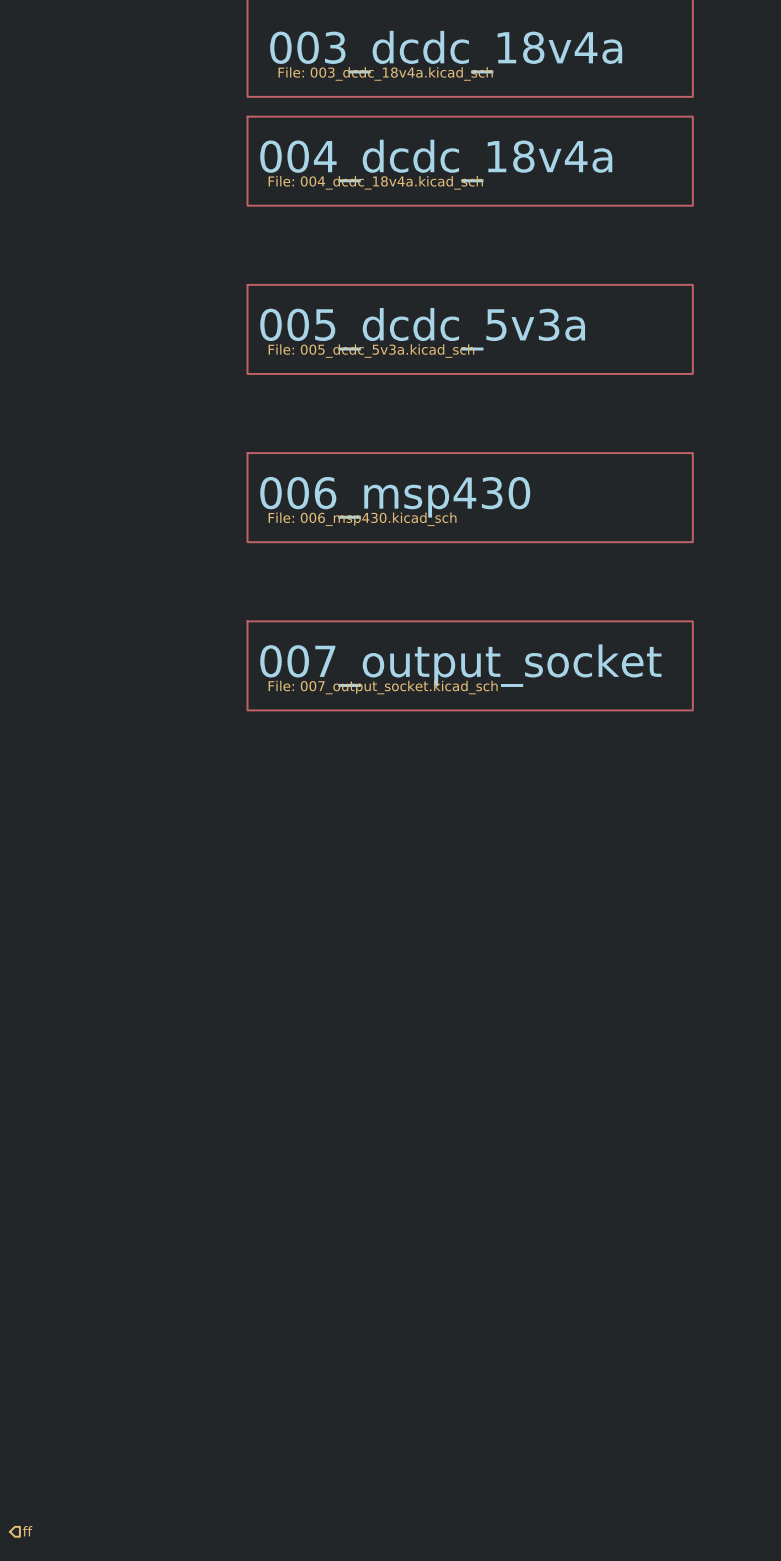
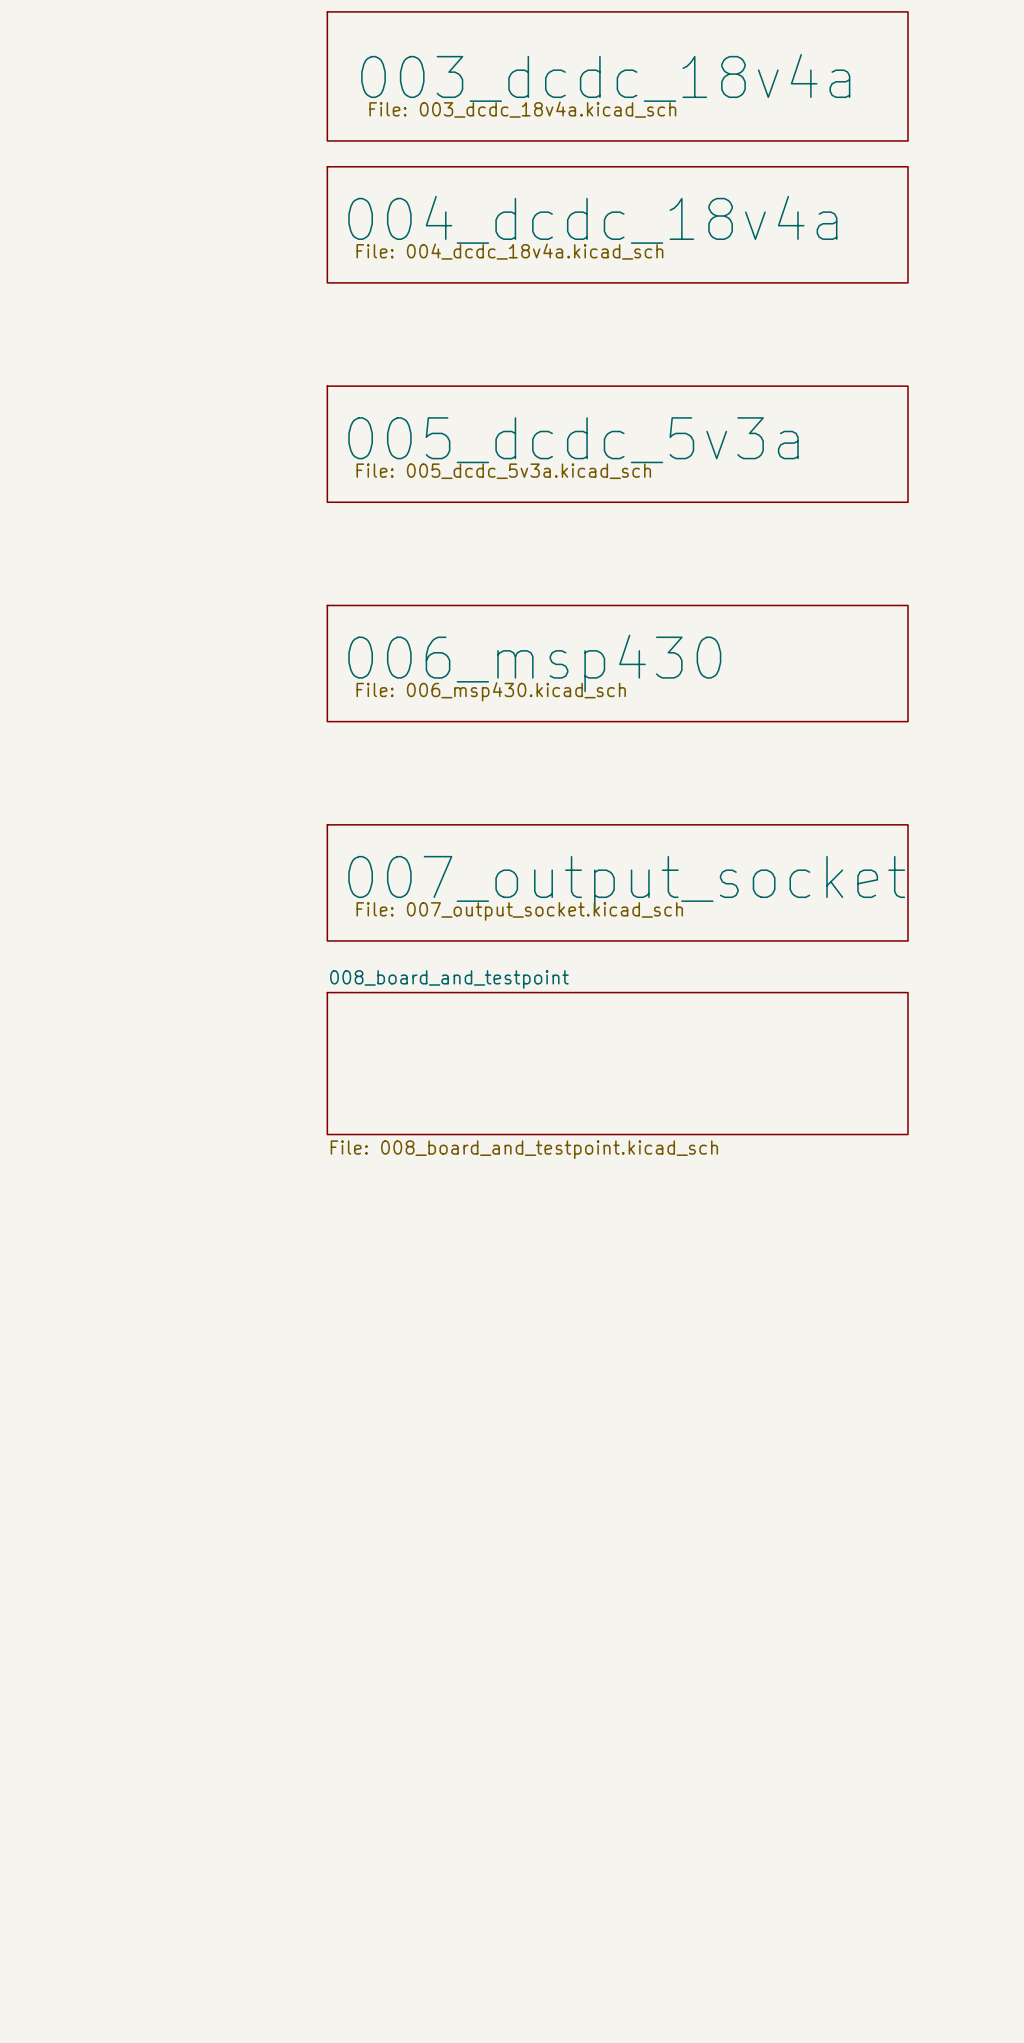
sheet 008_board_and_testpoint: none -> File: 008_board_and_testpoint.kicad_sch (617, 1063)
hierarchical label: ff (27, 1531) -> none

